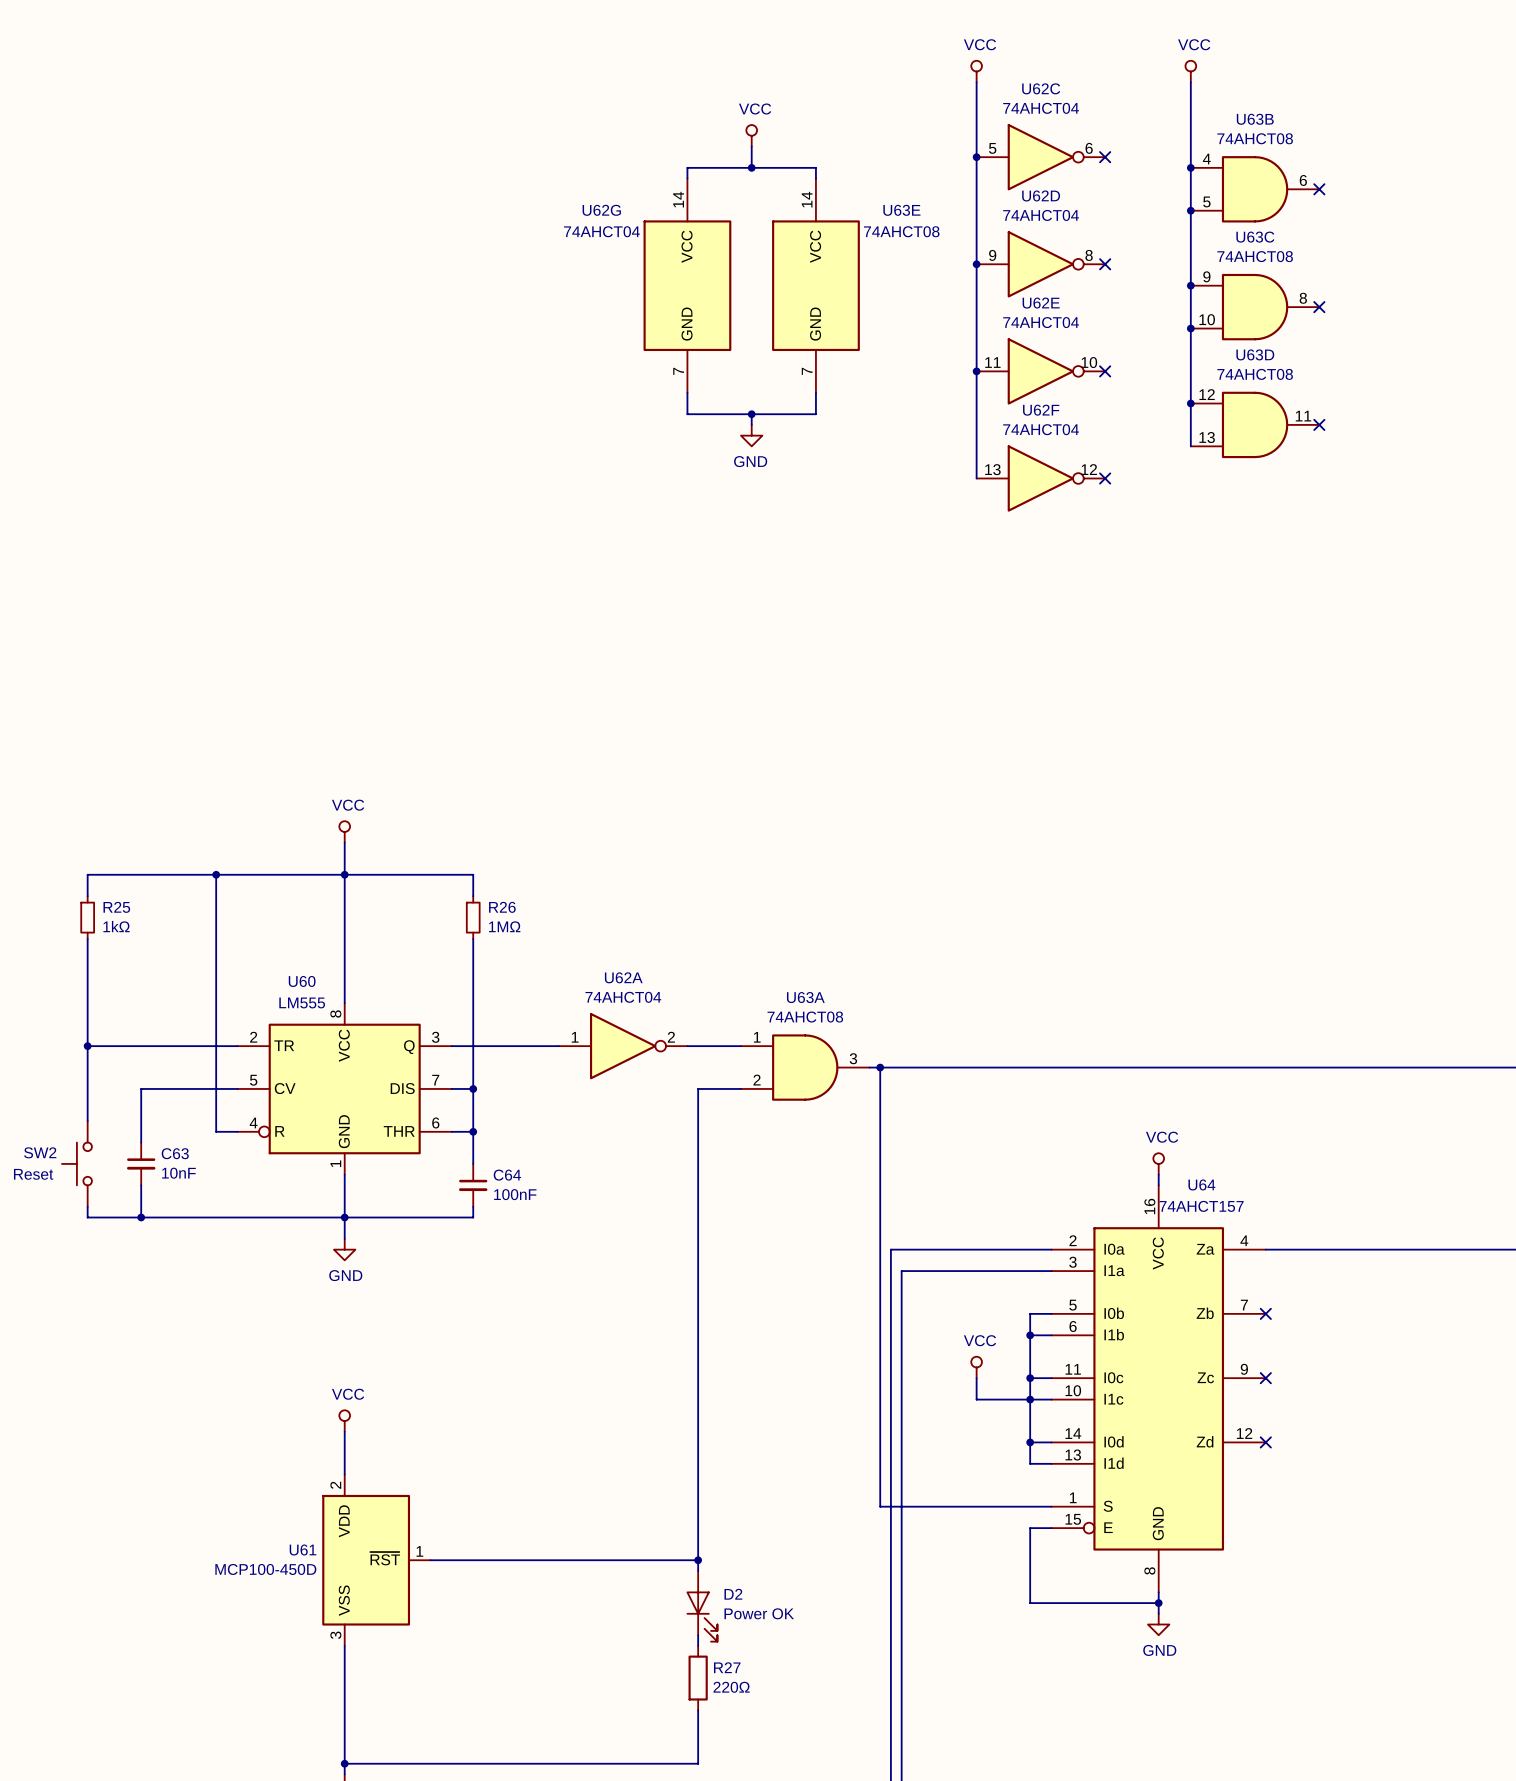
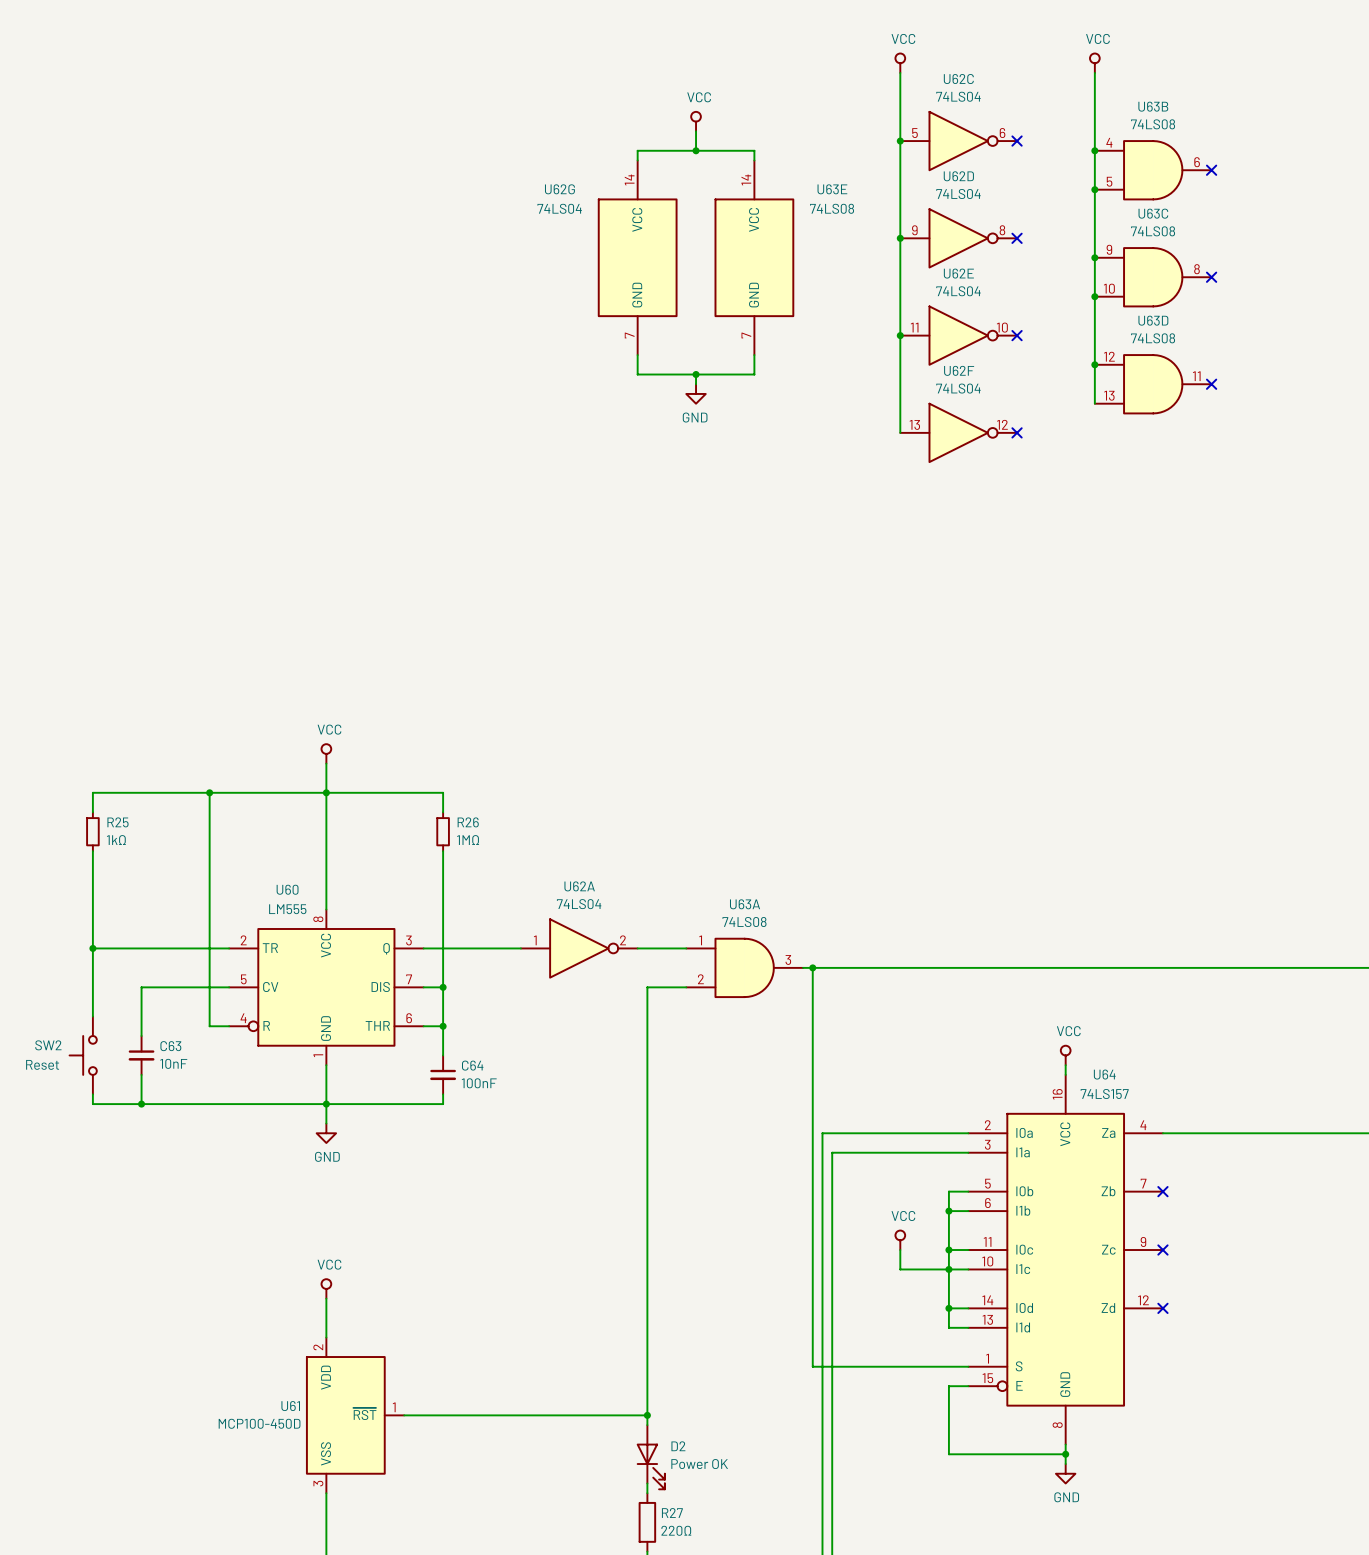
U62C value: 74AHCT04 (1041, 108) -> 74LS04 (958, 96)
U63B value: 74AHCT08 (1255, 138) -> 74LS08 (1153, 124)
U62D value: 74AHCT04 (1041, 215) -> 74LS04 (958, 194)
U62G value: 74AHCT04 (601, 231) -> 74LS04 (559, 208)
U63E value: 74AHCT08 (901, 231) -> 74LS08 (832, 208)
U63C value: 74AHCT08 (1255, 256) -> 74LS08 (1153, 231)
U62E value: 74AHCT04 (1041, 322) -> 74LS04 (958, 291)
U63D value: 74AHCT08 (1255, 374) -> 74LS08 (1153, 338)
U62F value: 74AHCT04 (1041, 429) -> 74LS04 (958, 388)
U62A value: 74AHCT04 (623, 997) -> 74LS04 (579, 904)
U63A value: 74AHCT08 (805, 1017) -> 74LS08 (744, 922)
U64 value: 74AHCT157 (1201, 1206) -> 74LS157 (1104, 1094)

